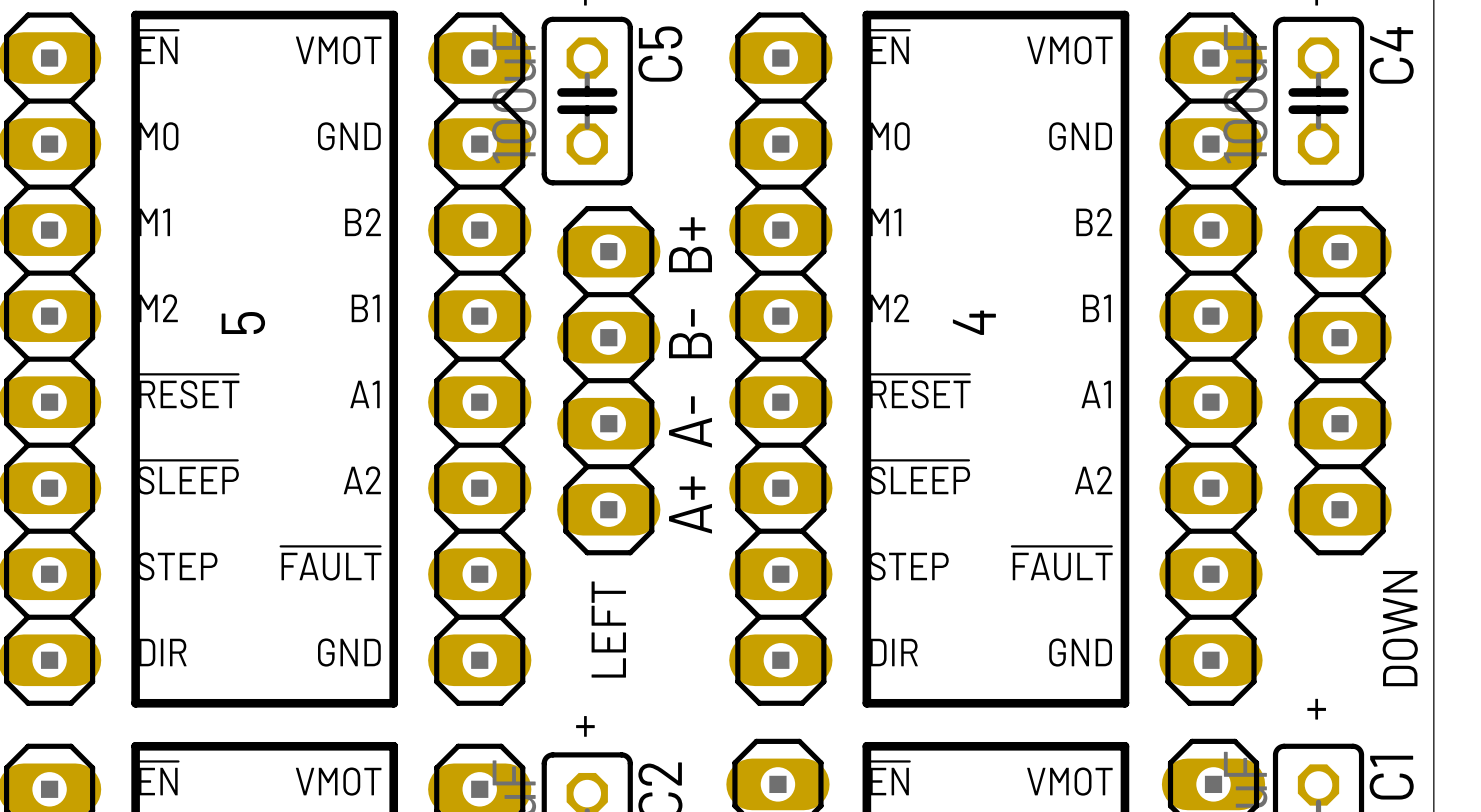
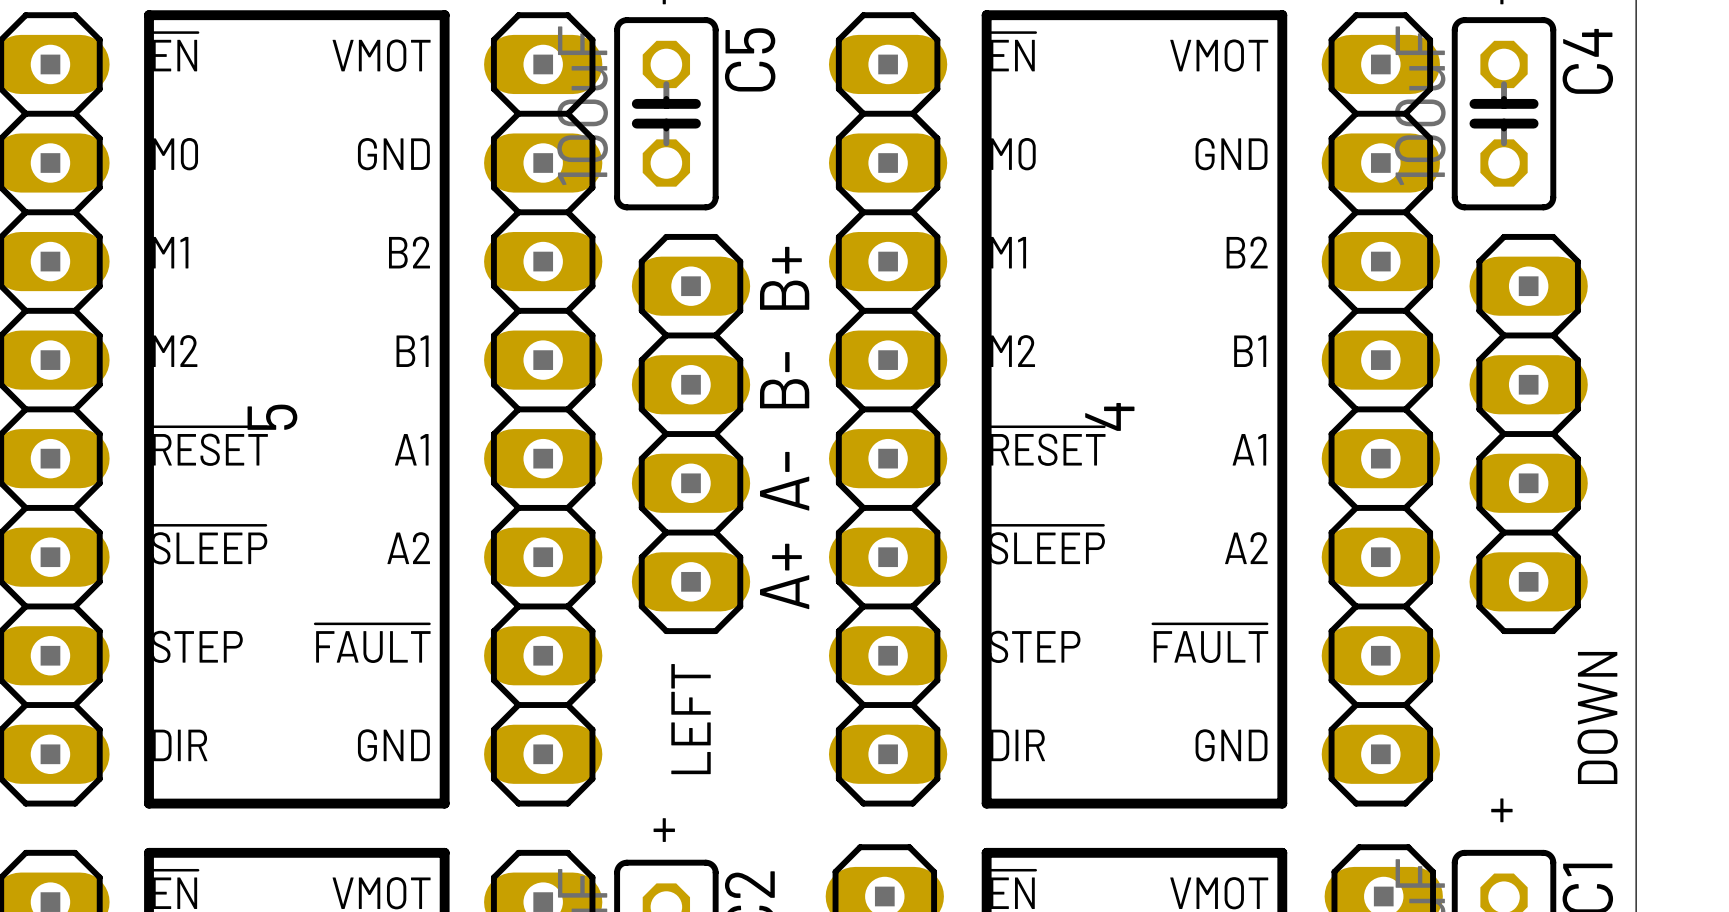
text position: 4 (974, 322) -> 4 (1109, 416)
text position: 5 (243, 323) -> 5 (272, 417)

